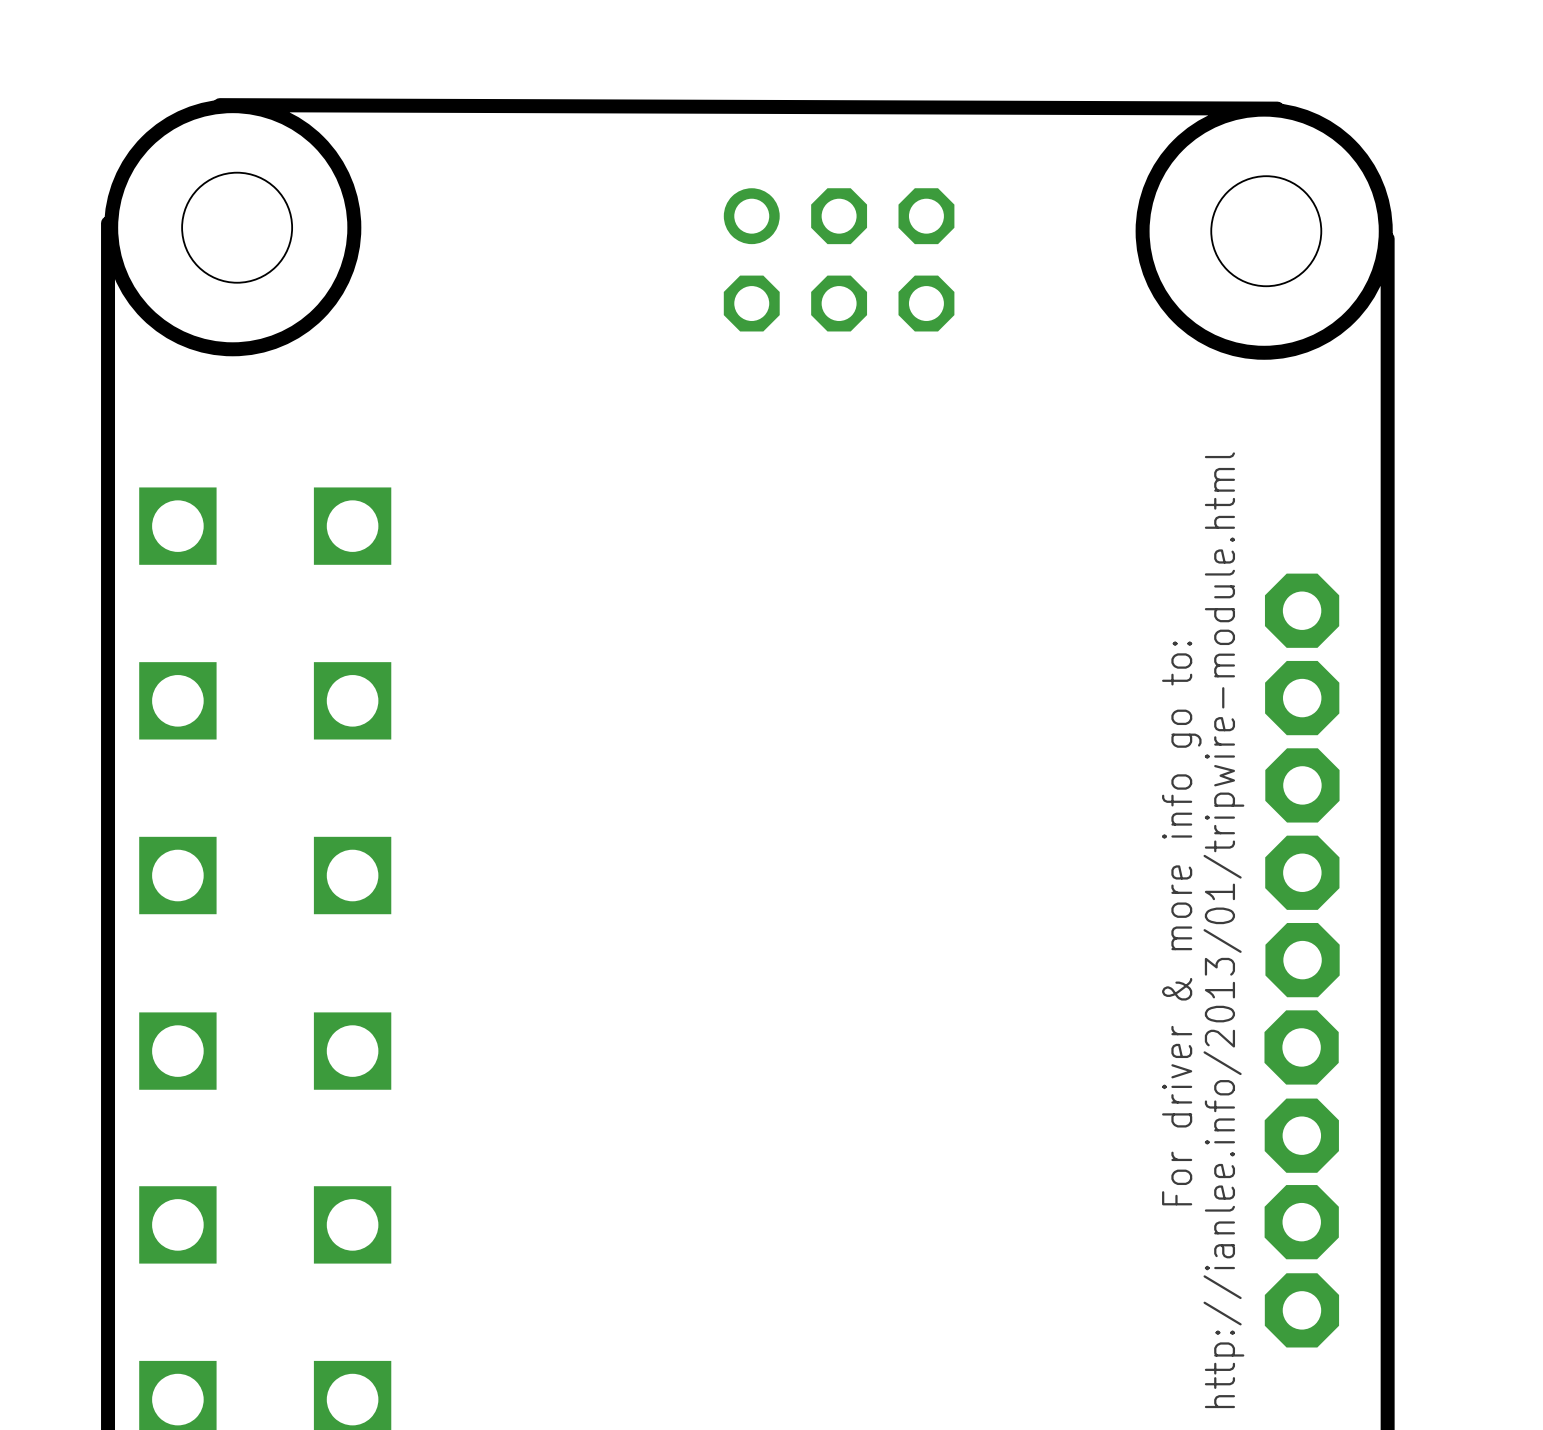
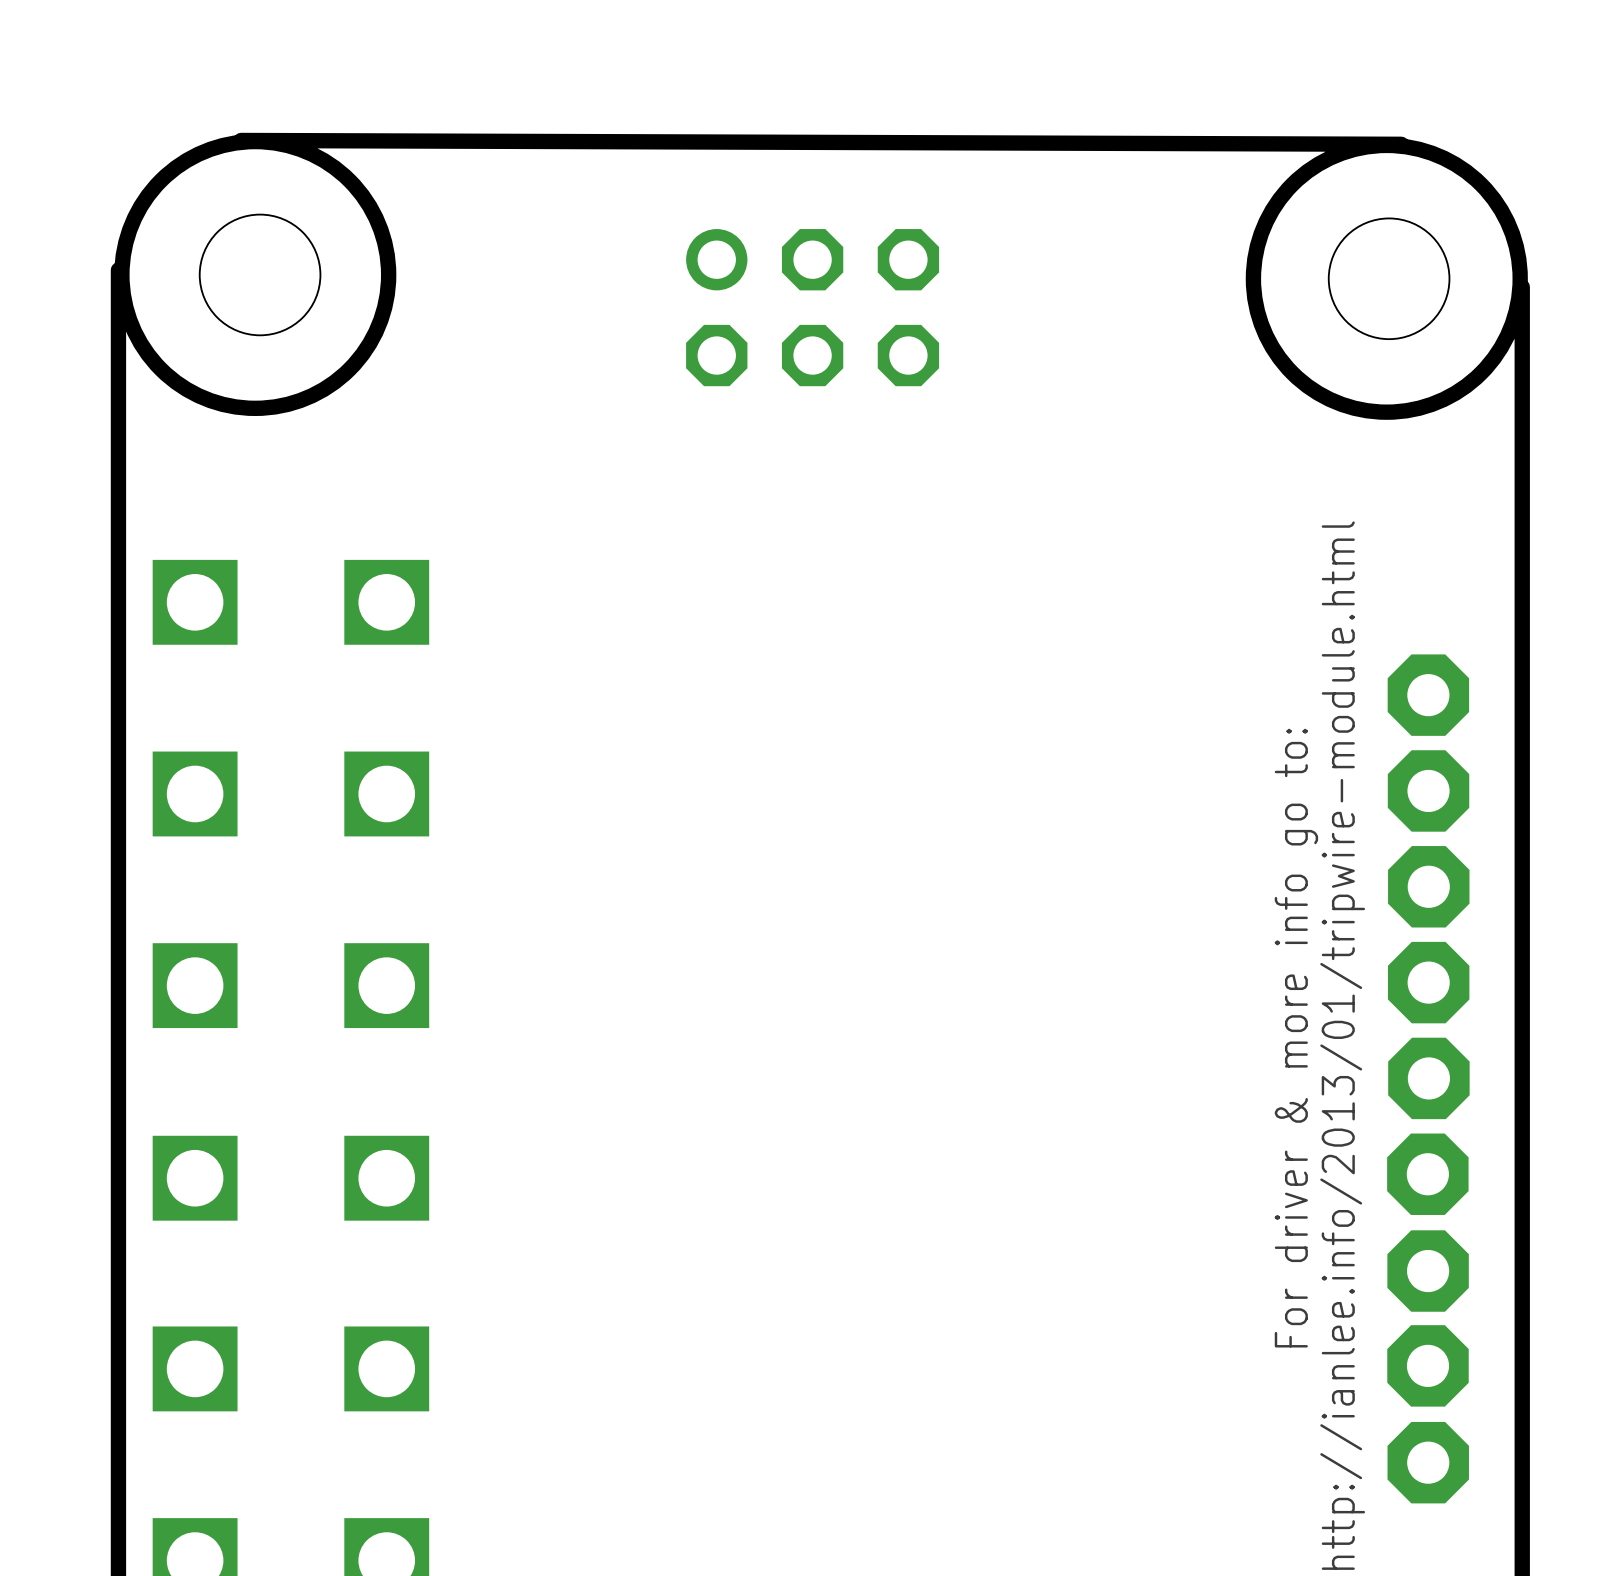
part position: (839, 259) -> (812, 307)

